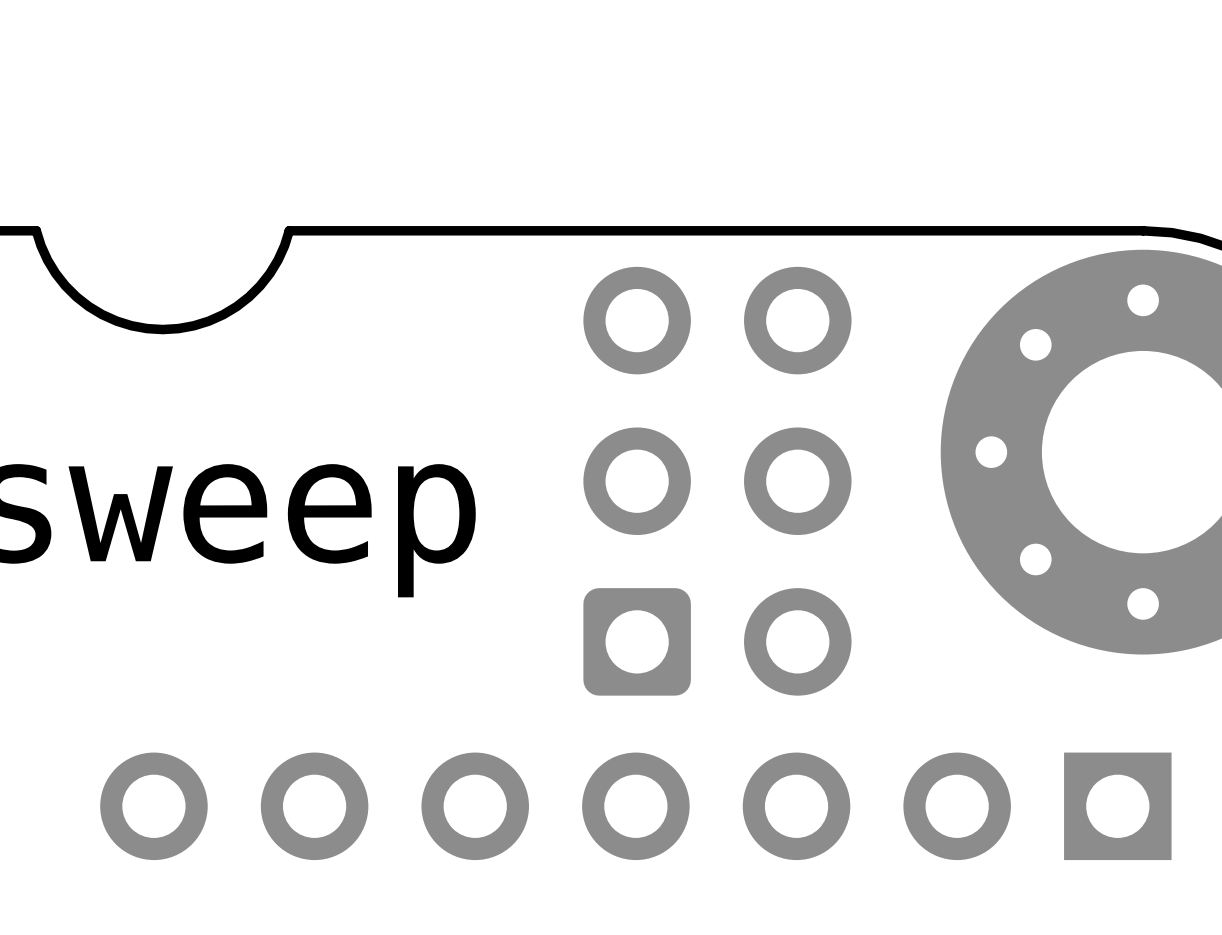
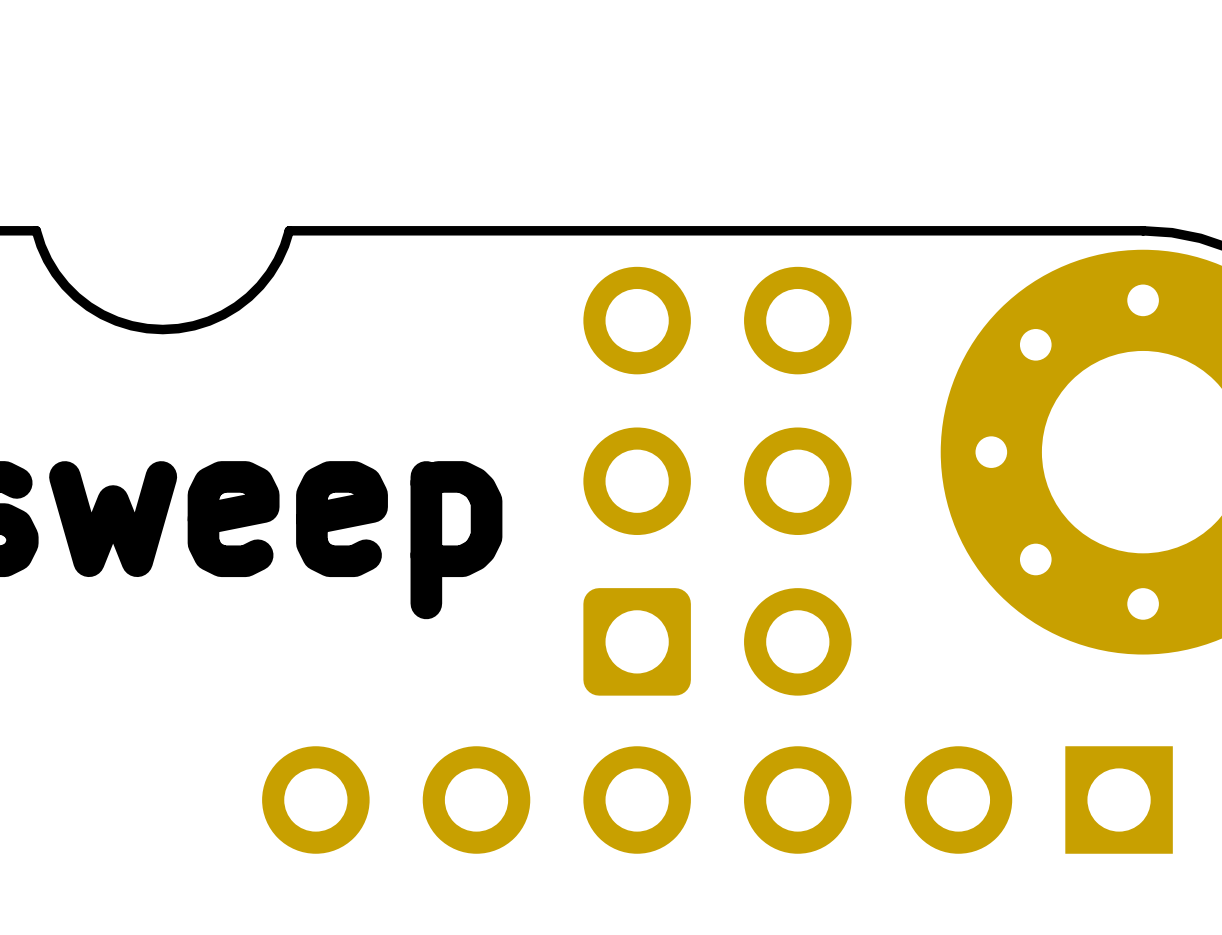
part: none -> (717, 799)
part: (635, 806) -> none

